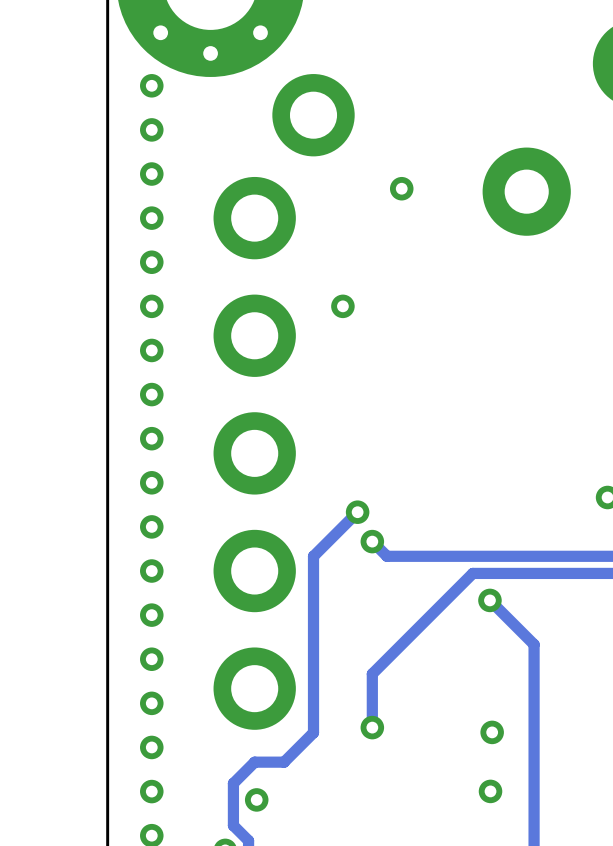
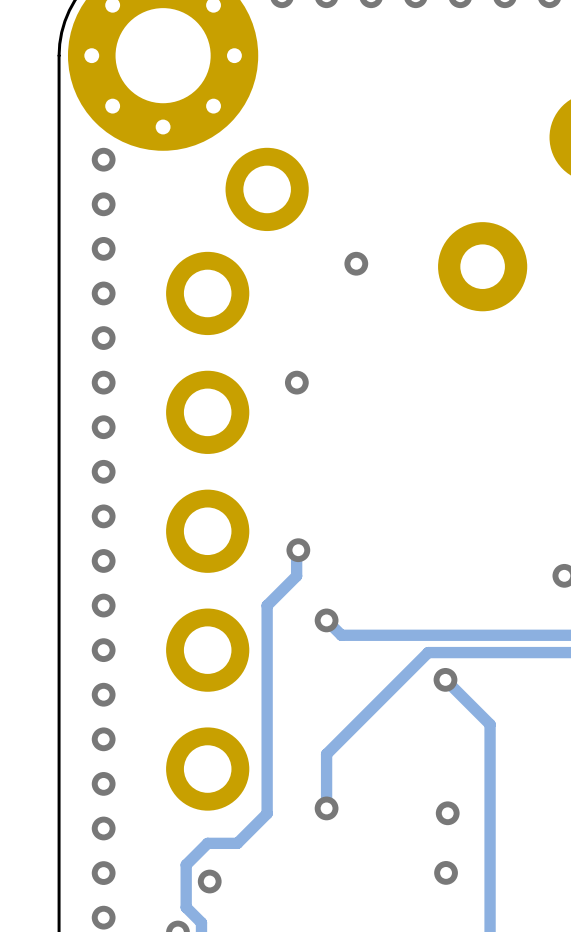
track: (357, 512) (313, 556) -> (298, 550) (296, 551) (296, 576) (267, 605) (267, 635)
via position: (357, 512) -> (298, 550)

